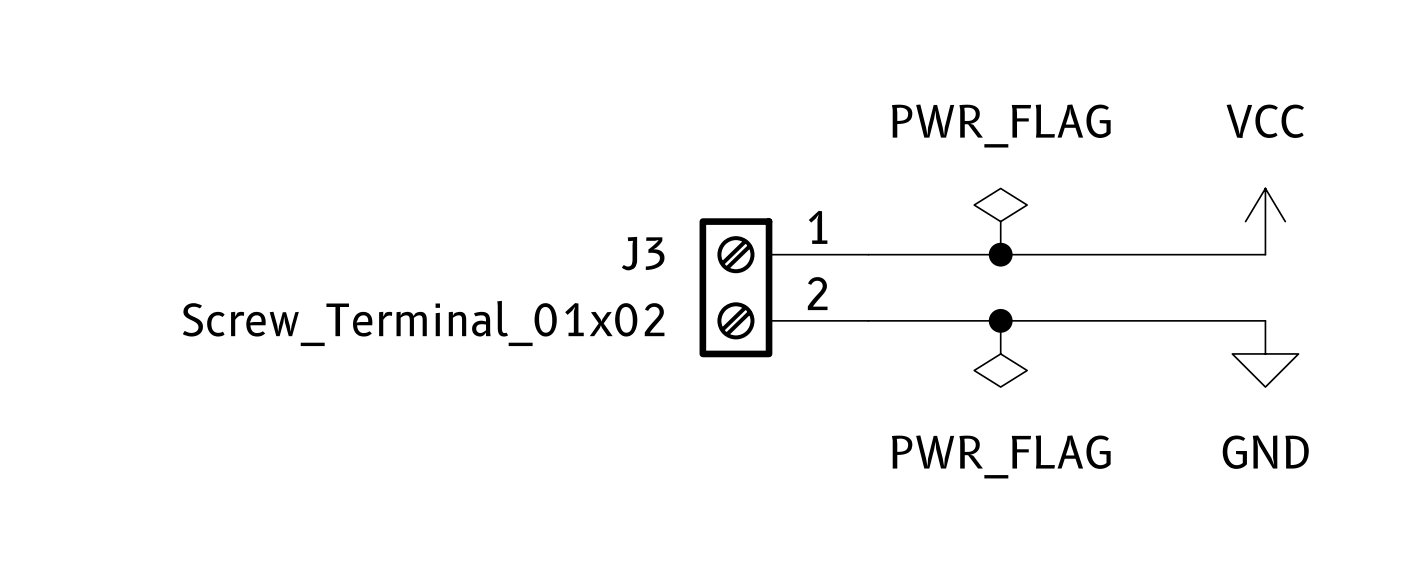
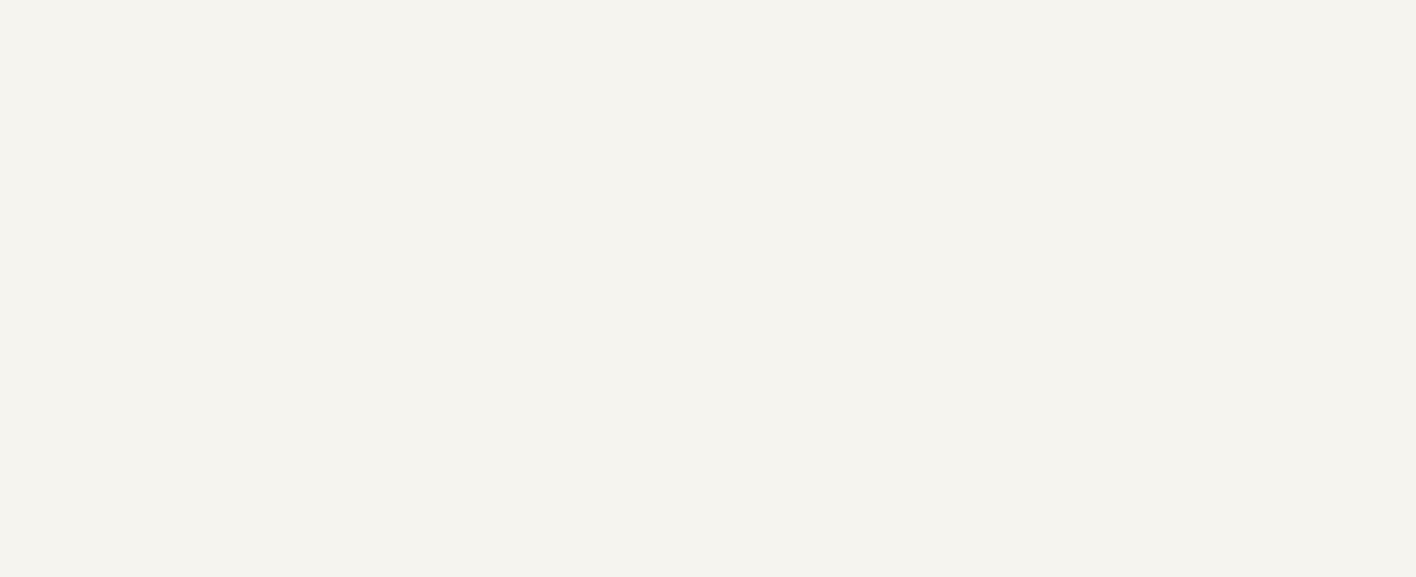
power symbol: PWR_FLAG (1000, 221) -> none
power symbol: VCC (1265, 221) -> none
wire: (868, 254) (1265, 254) -> none
junction: (1000, 254) -> none
J3: Screw_Terminal_01x02 (783, 287) -> none
wire: (868, 320) (1265, 320) -> none
junction: (1000, 320) -> none
power symbol: PWR_FLAG (1000, 353) -> none
power symbol: GND (1265, 353) -> none

